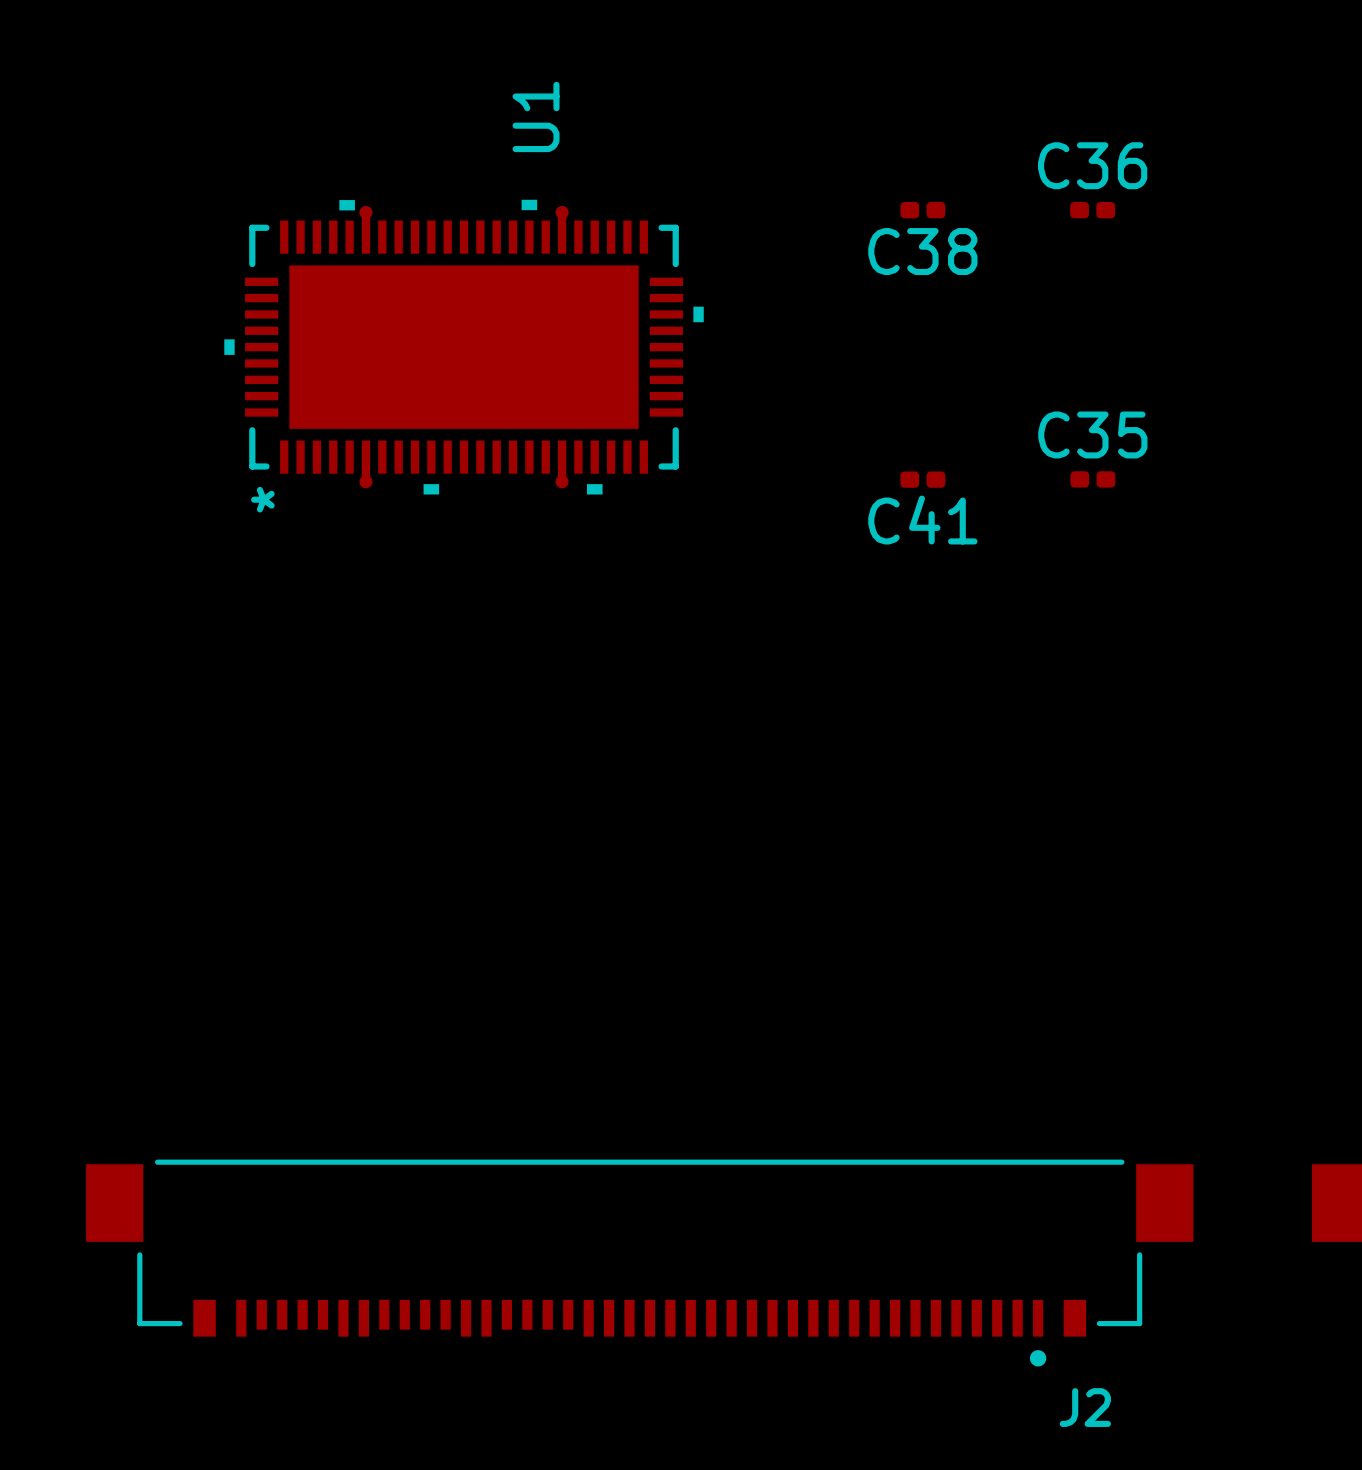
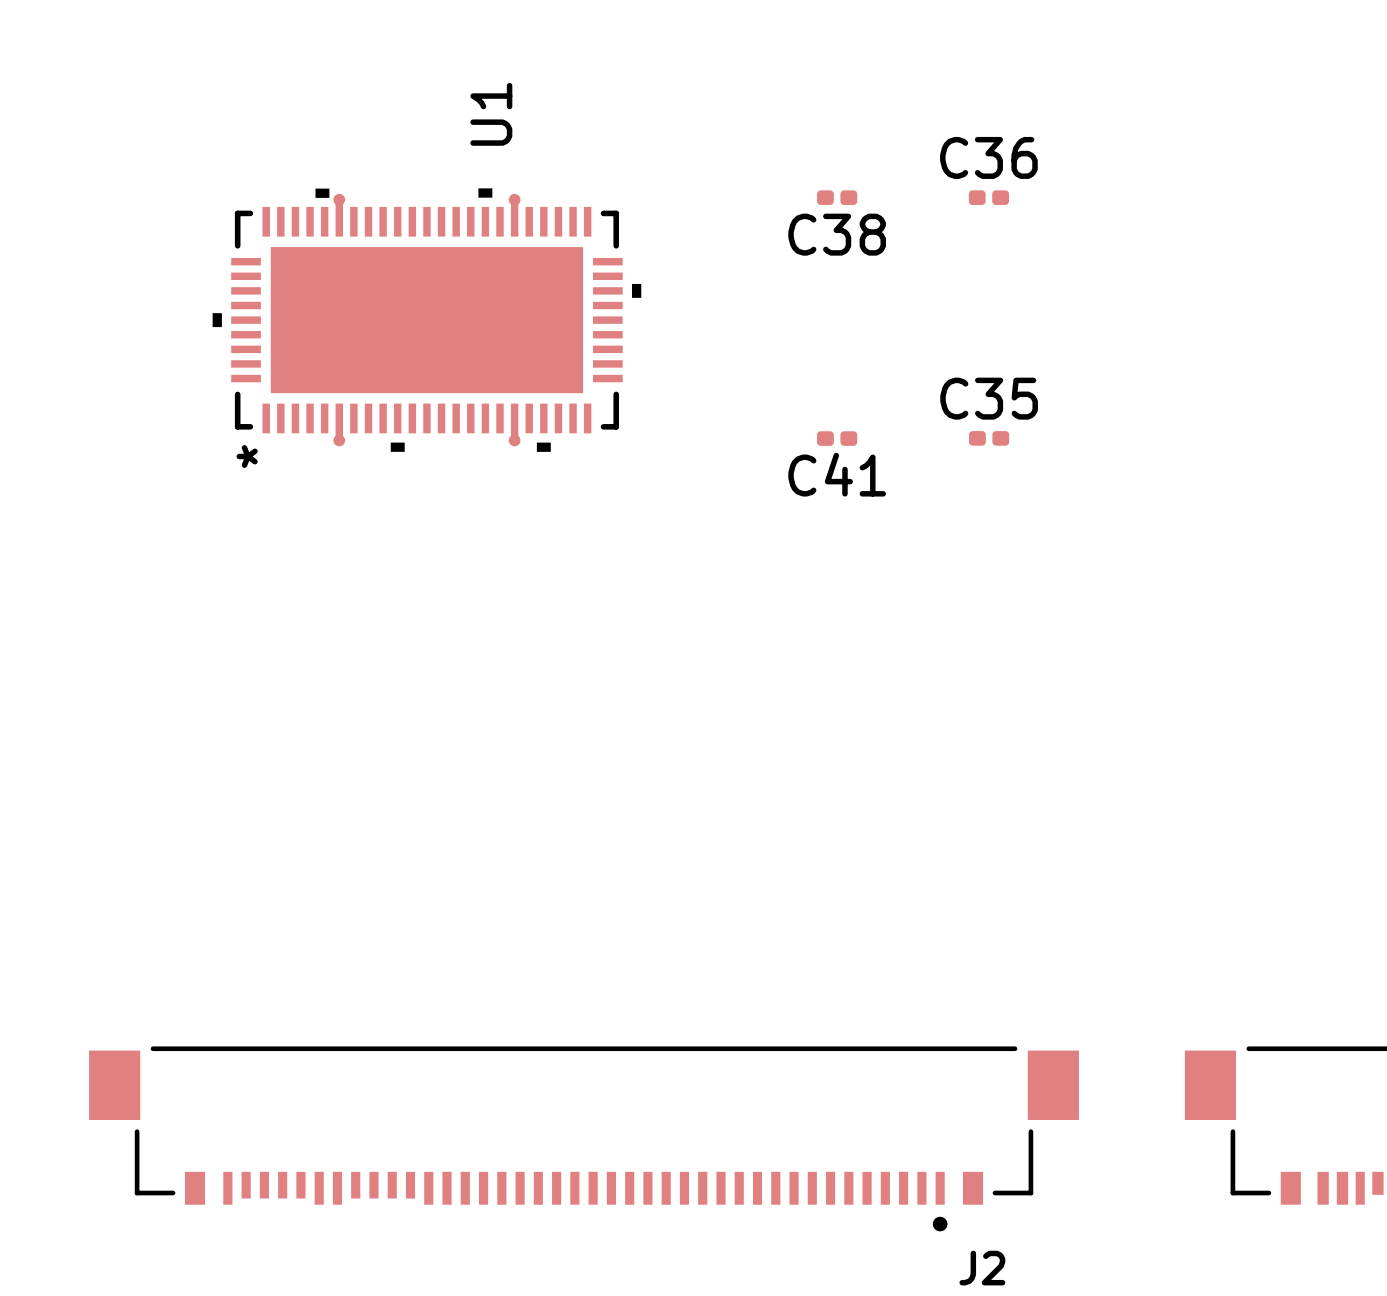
J2 footprint: [86, 1159, 1194, 1367] -> [89, 1046, 1079, 1232]

